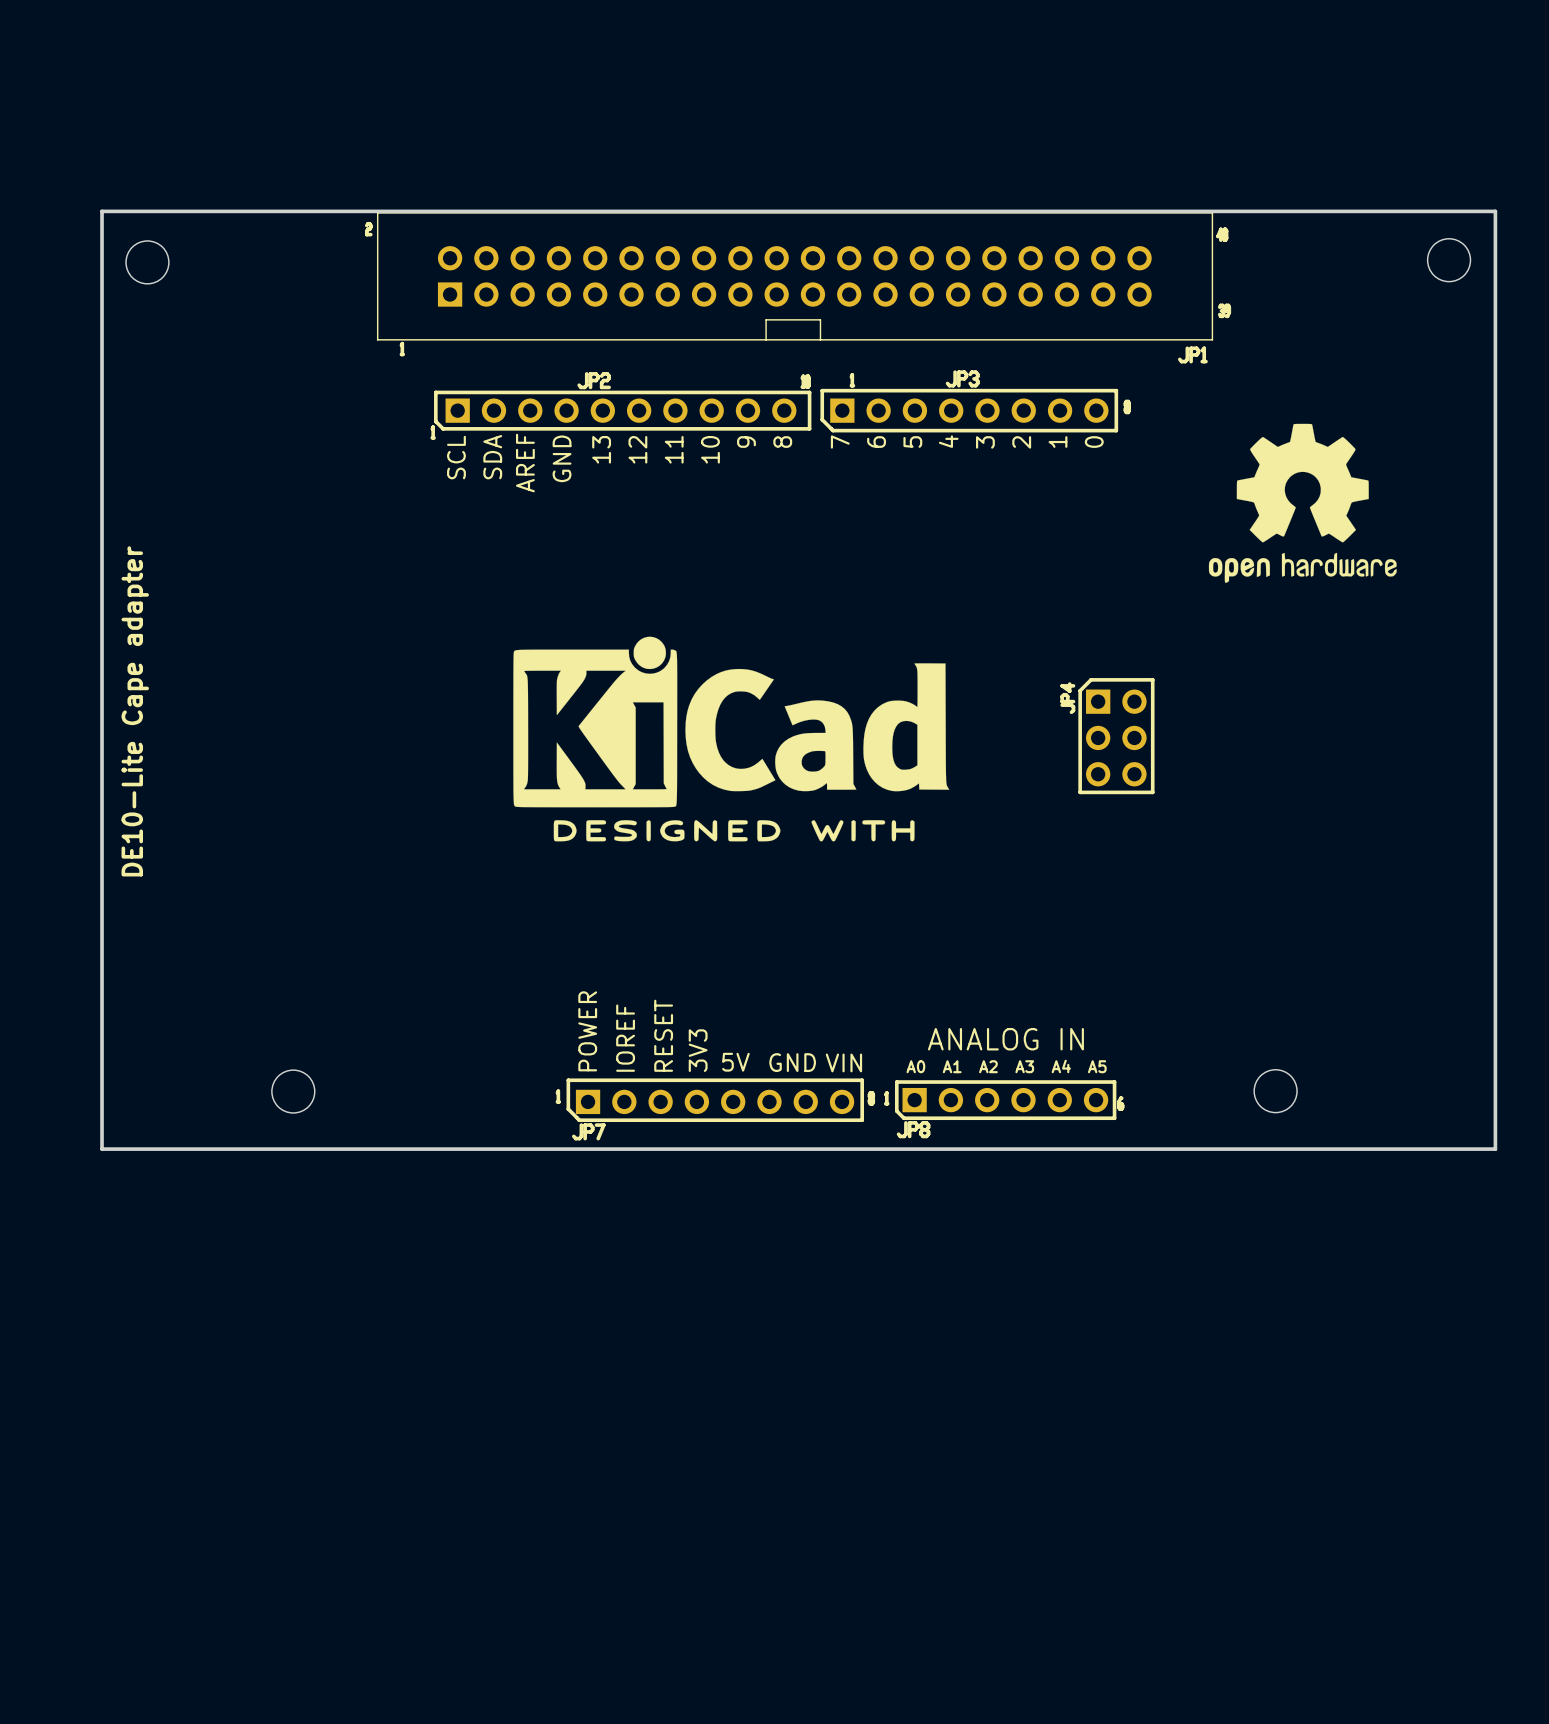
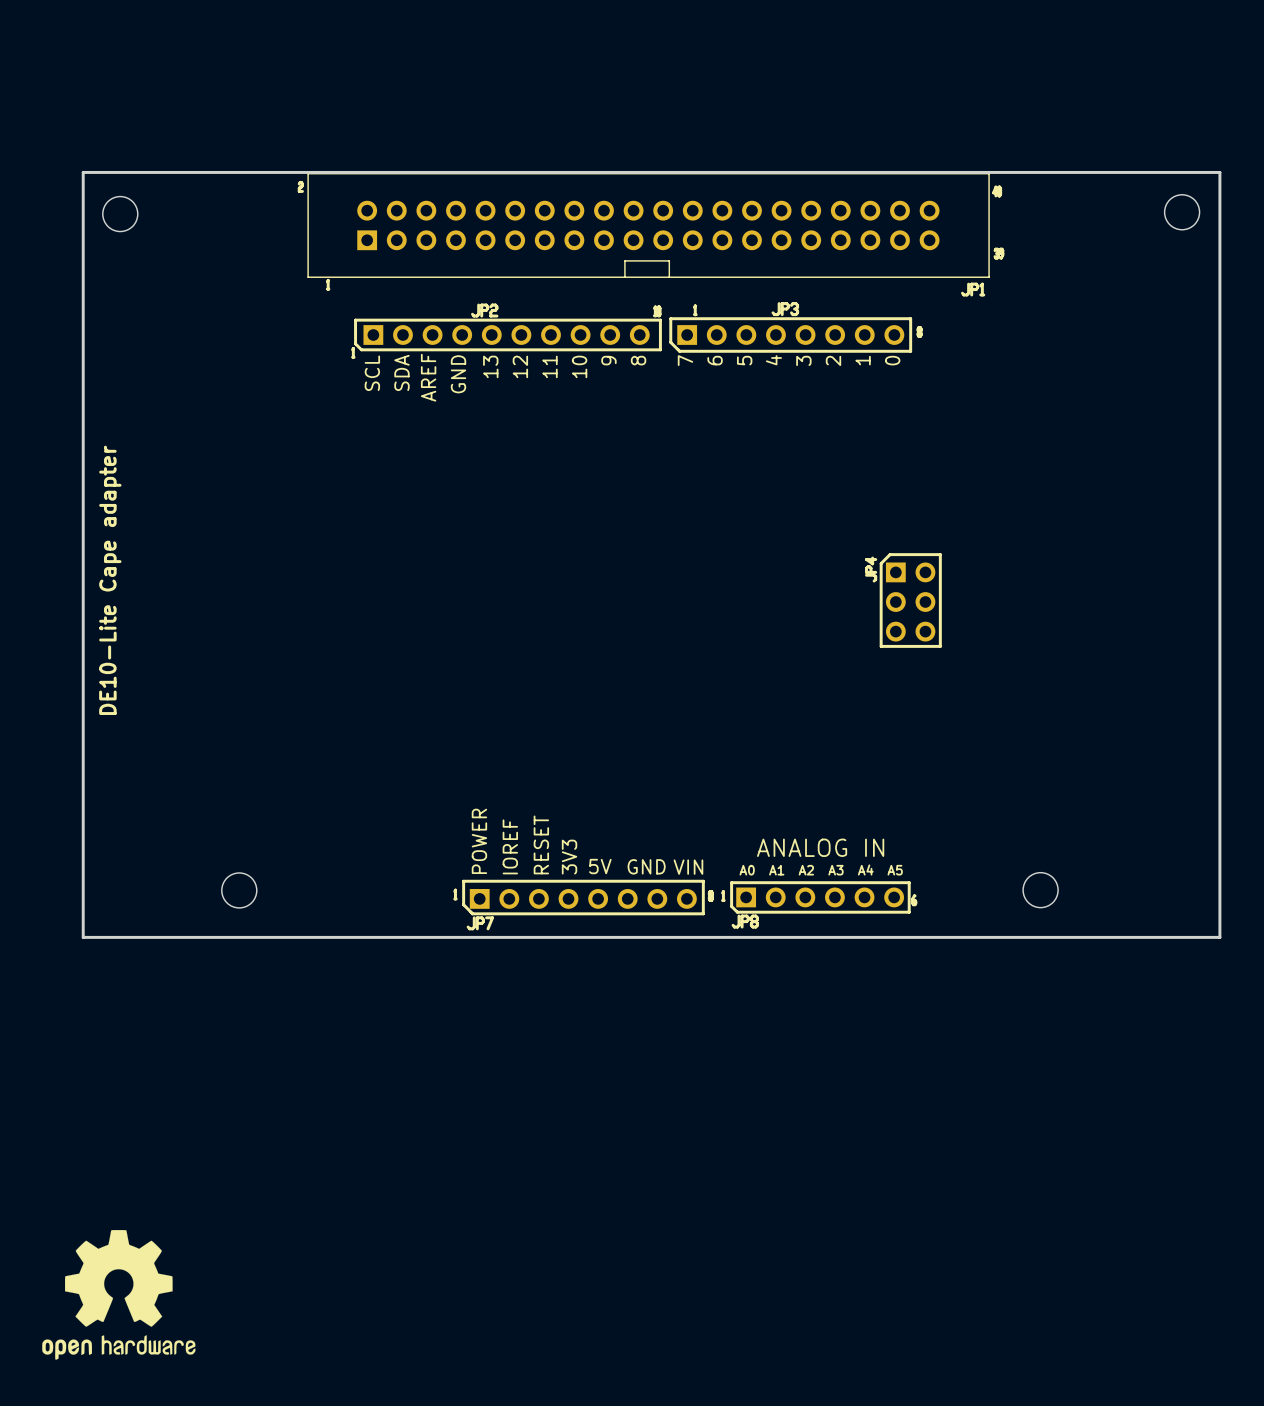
drawing: [1208, 423, 1397, 583] -> none
drawing: [513, 636, 950, 842] -> none
drawing: none -> [42, 1230, 196, 1360]

